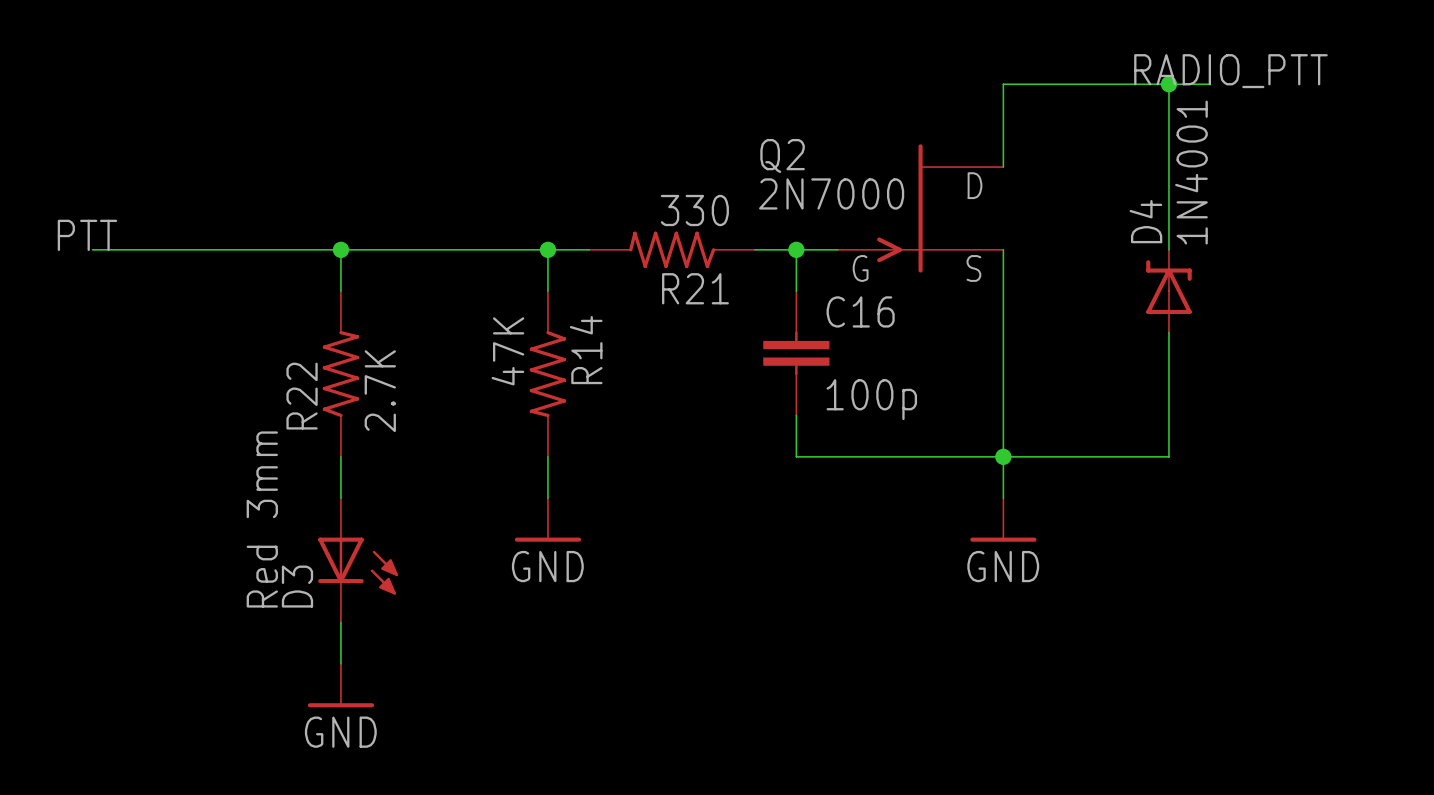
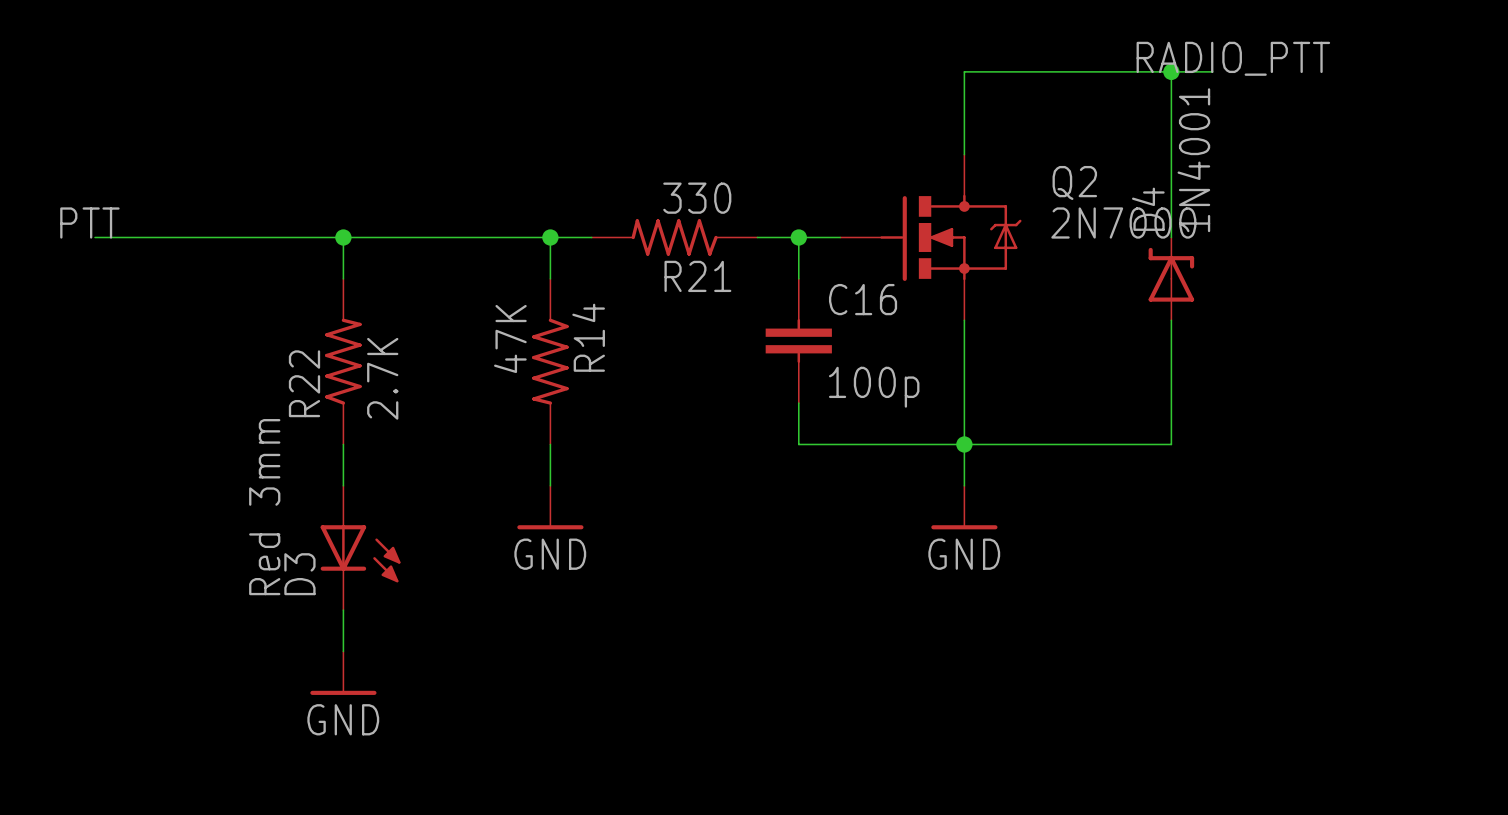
wire: (1003, 84) (1003, 167) -> (1005, 71) (964, 71) (964, 154)
Q2 symbol: [837, 144, 1004, 273] -> [840, 154, 1022, 321]
Q2 name position: Q2 (782, 156) -> Q2 (1074, 182)
Q2 value position: 2N7000 (831, 193) -> 2N7000 (1123, 223)
wire: (1003, 249) (1003, 498) -> none
wire: none -> (964, 320) (964, 485)
junction position: (1003, 456) -> (964, 444)
power symbol position: GND (1003, 519) -> GND (964, 507)

